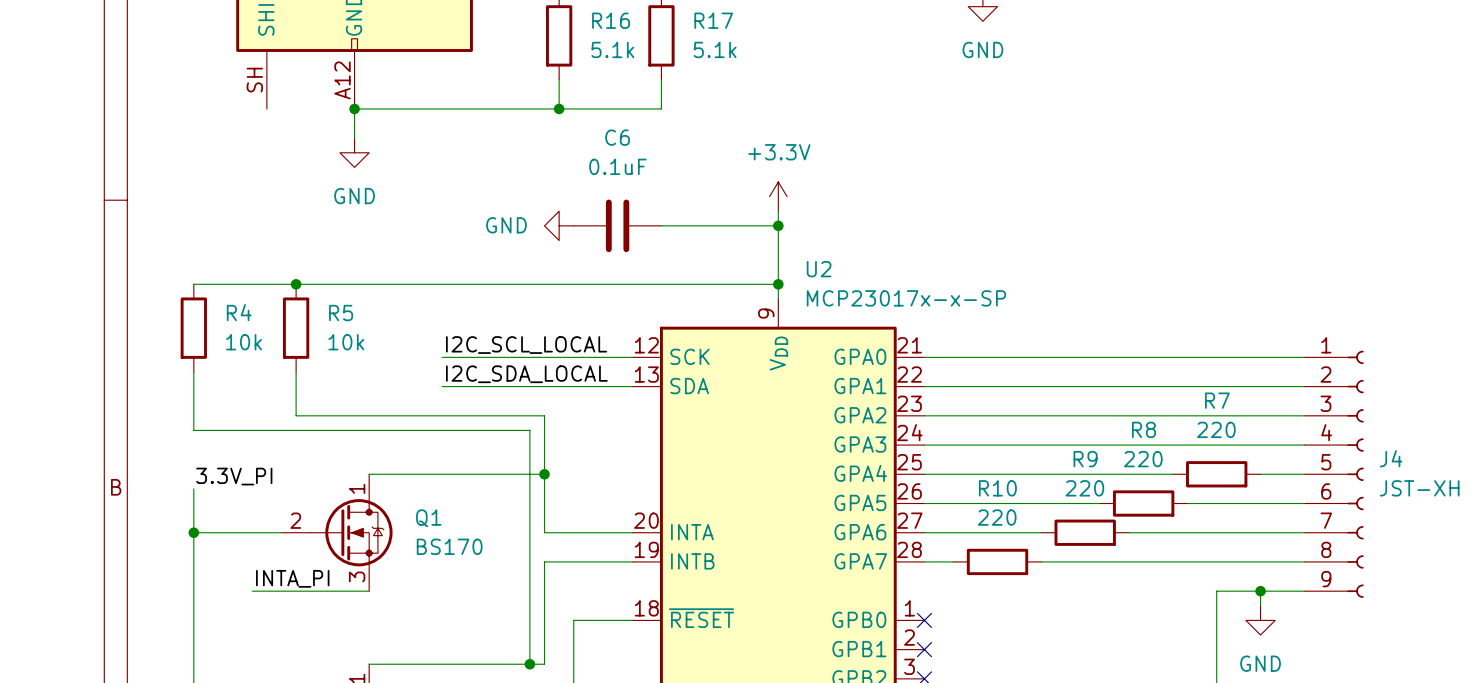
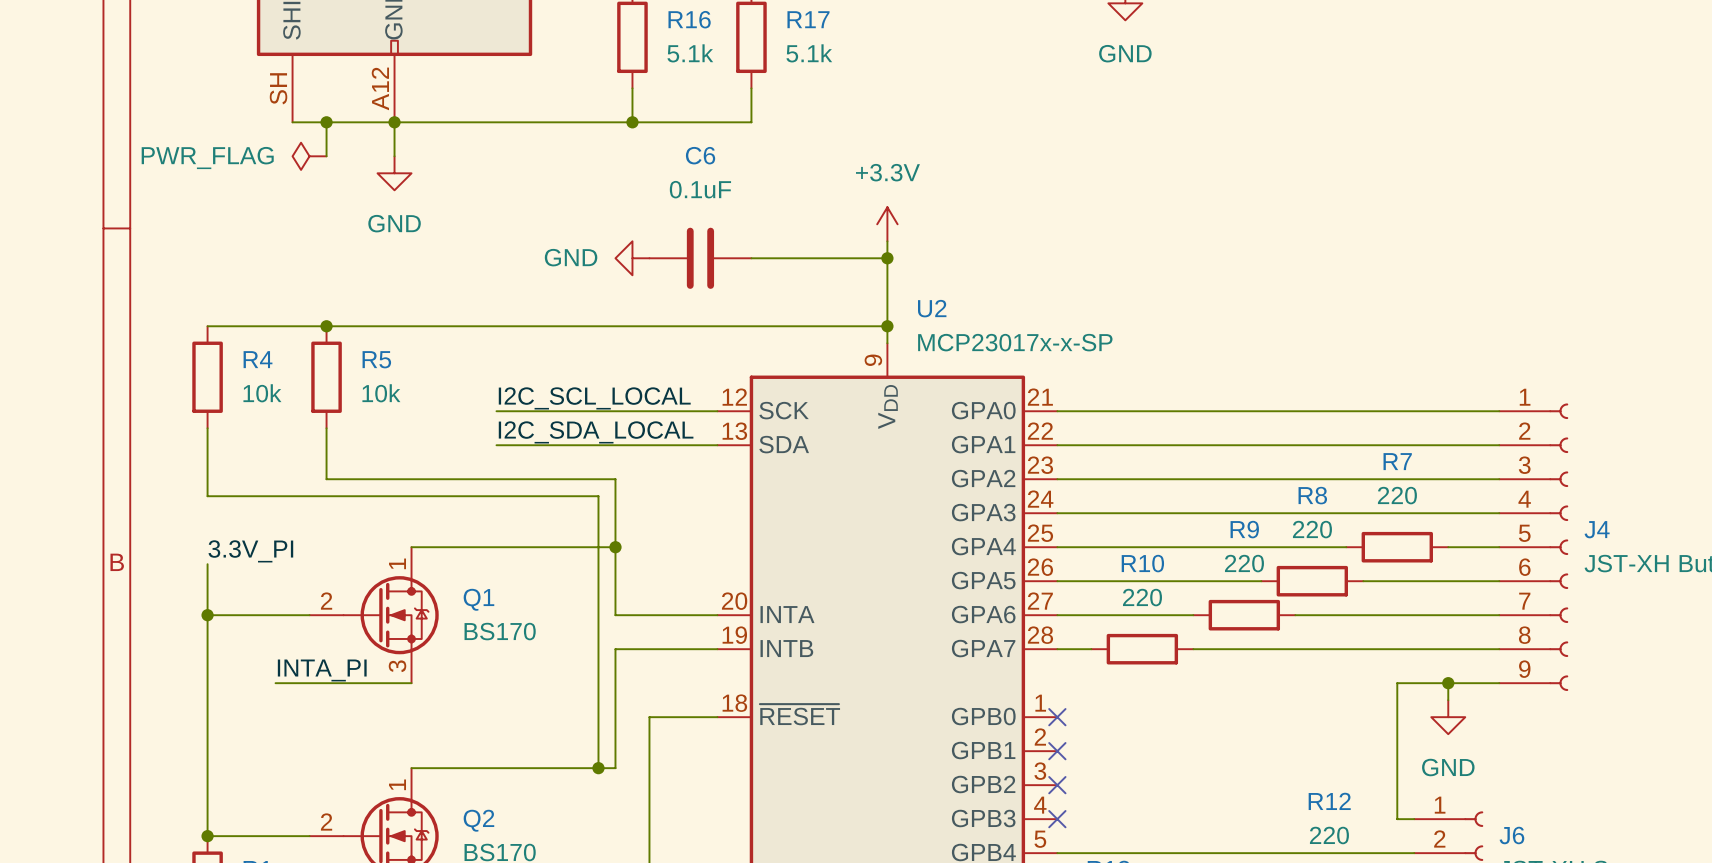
wire: none -> (292, 122) (394, 122)
wire: none -> (326, 122) (326, 156)
junction: none -> (326, 122)
power symbol: none -> PWR_FLAG (309, 156)

